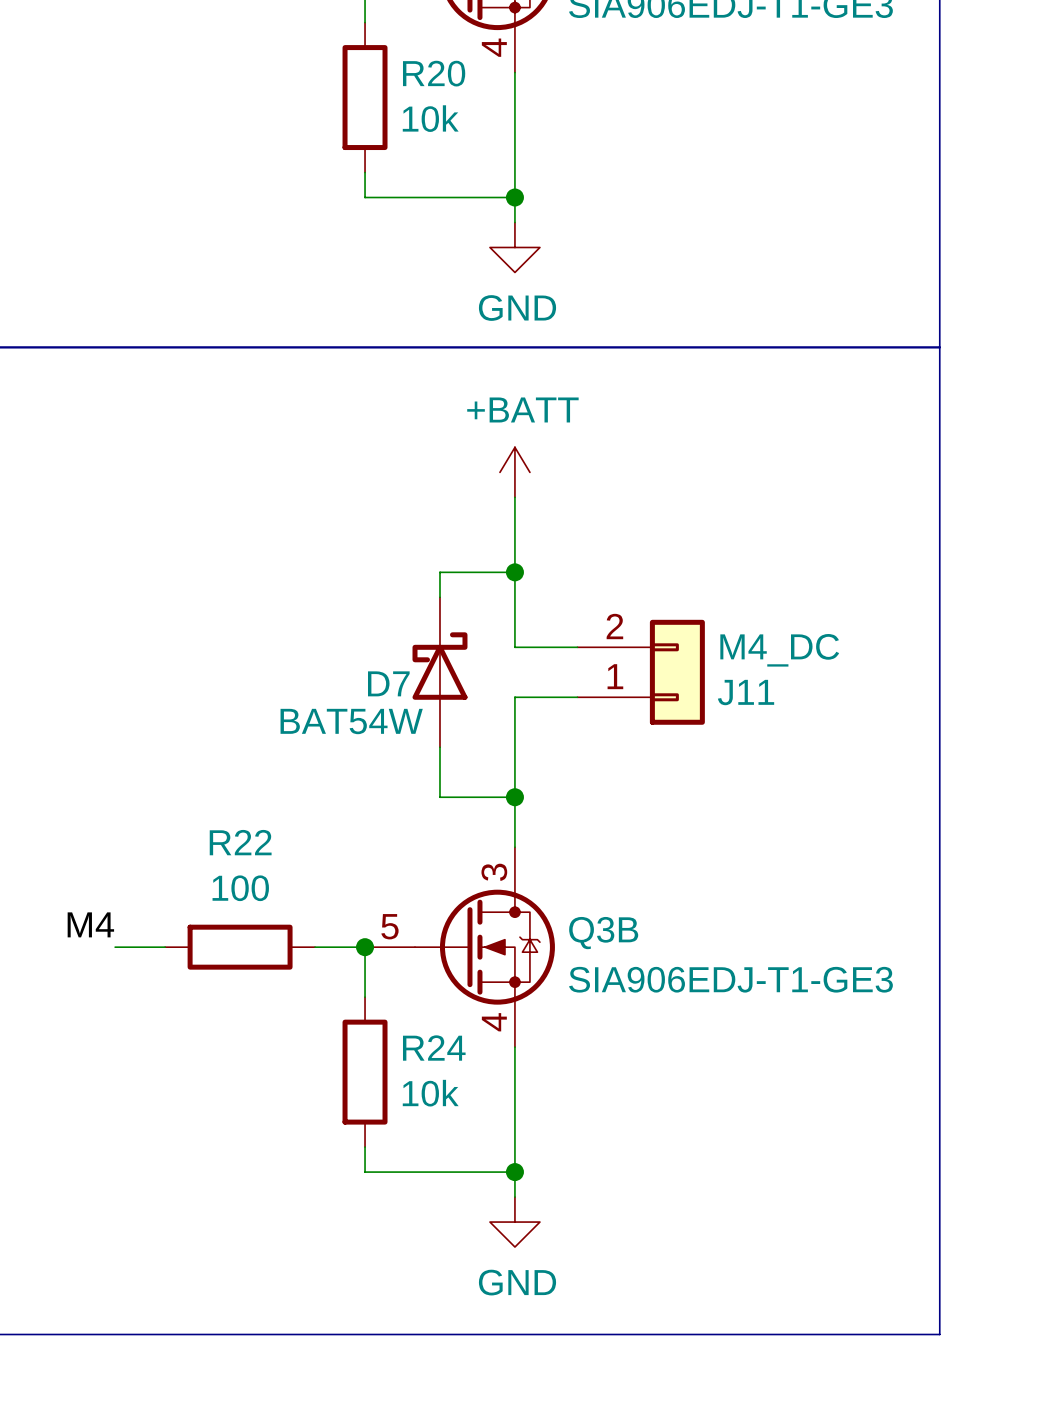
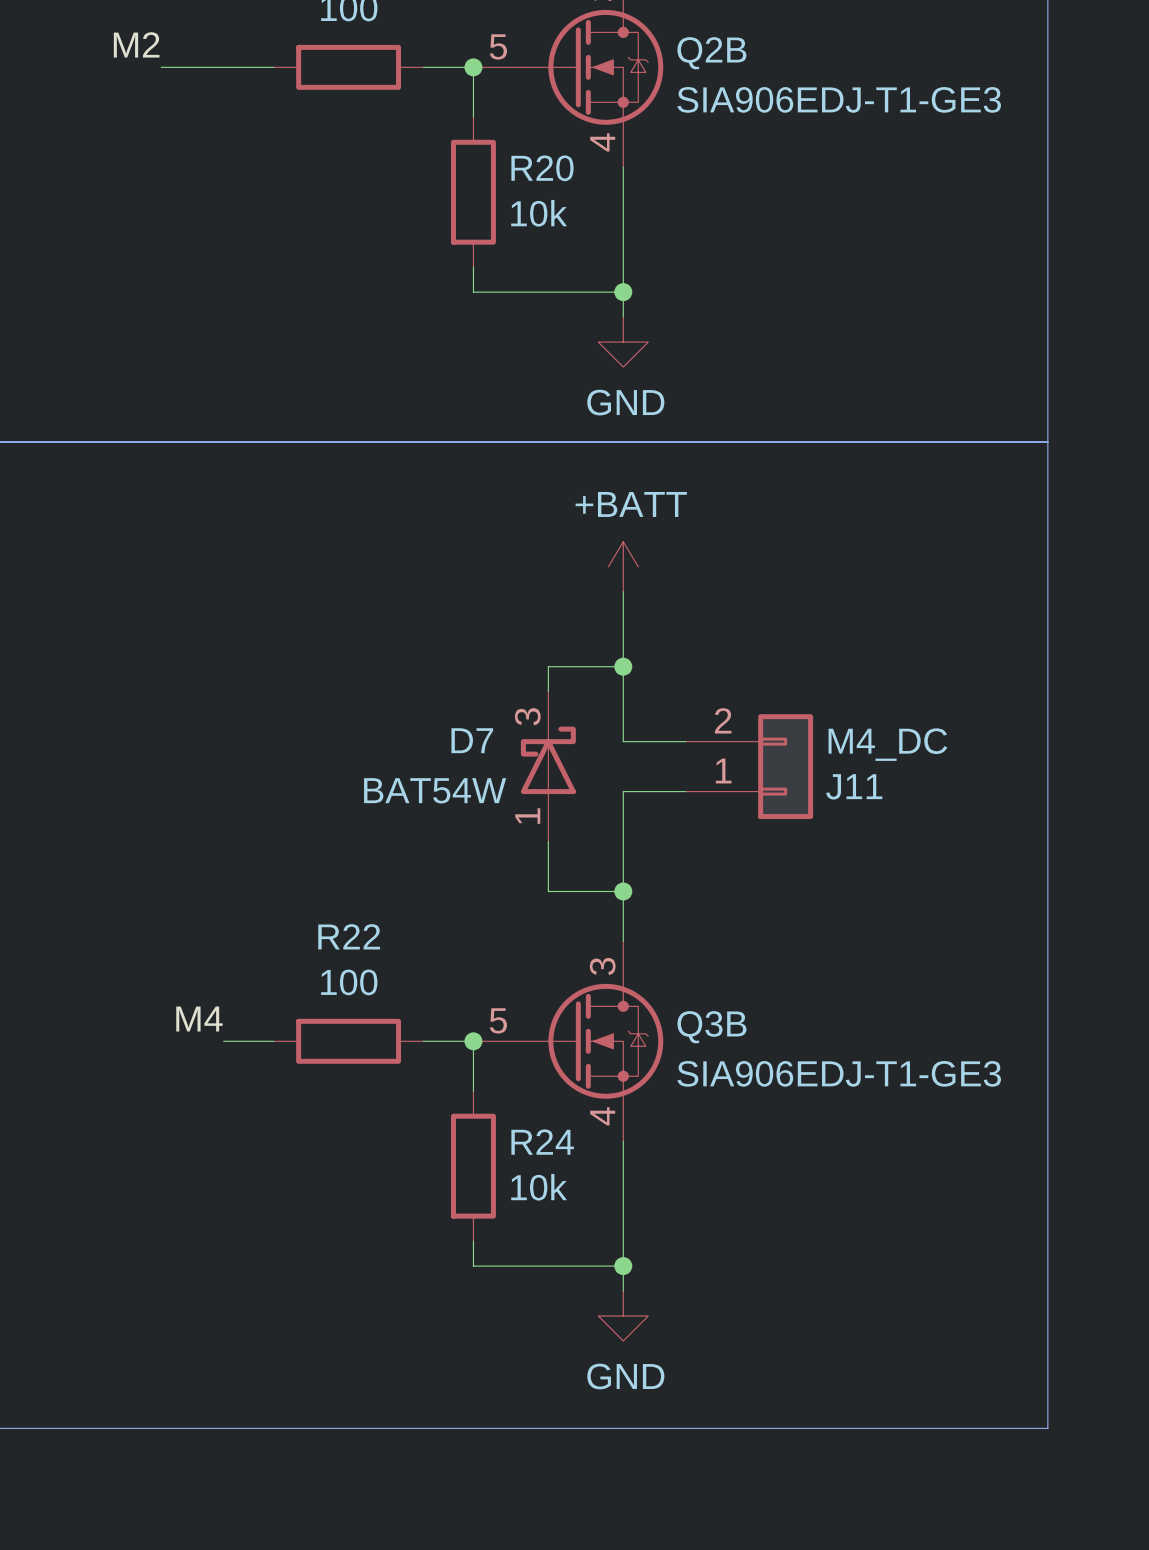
D7 pin number: none -> 3 (527, 716)
D7 name position: D7 (388, 683) -> D7 (472, 740)
D7 value position: BAT54W (351, 721) -> BAT54W (435, 790)
D7 pin number: none -> 1 (527, 816)

